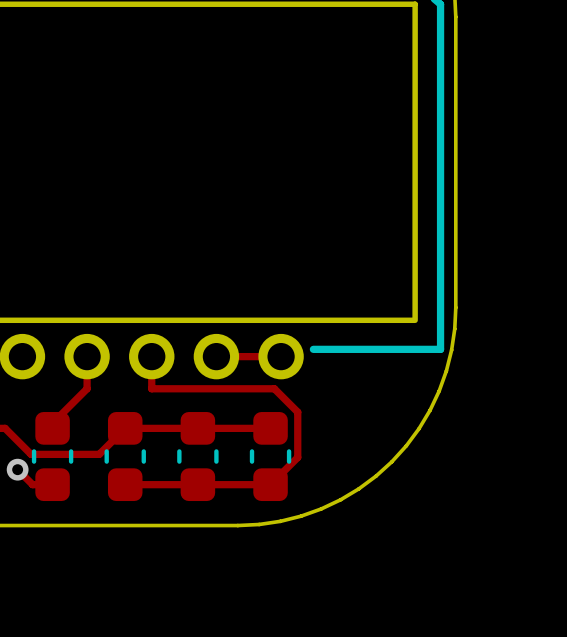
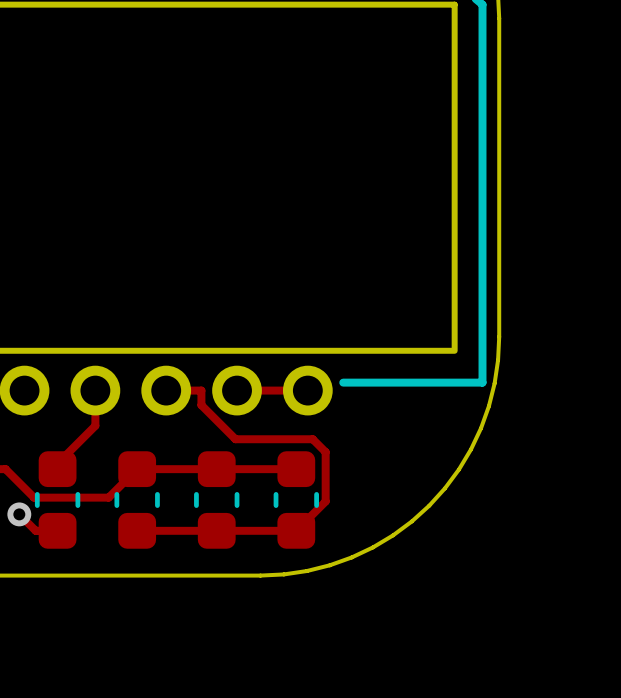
track: (151, 356) (151, 388) (274, 388) (297, 412) (297, 457) -> (166, 390) (201, 390) (201, 405) (235, 439) (312, 439) (325, 452) (325, 501)

